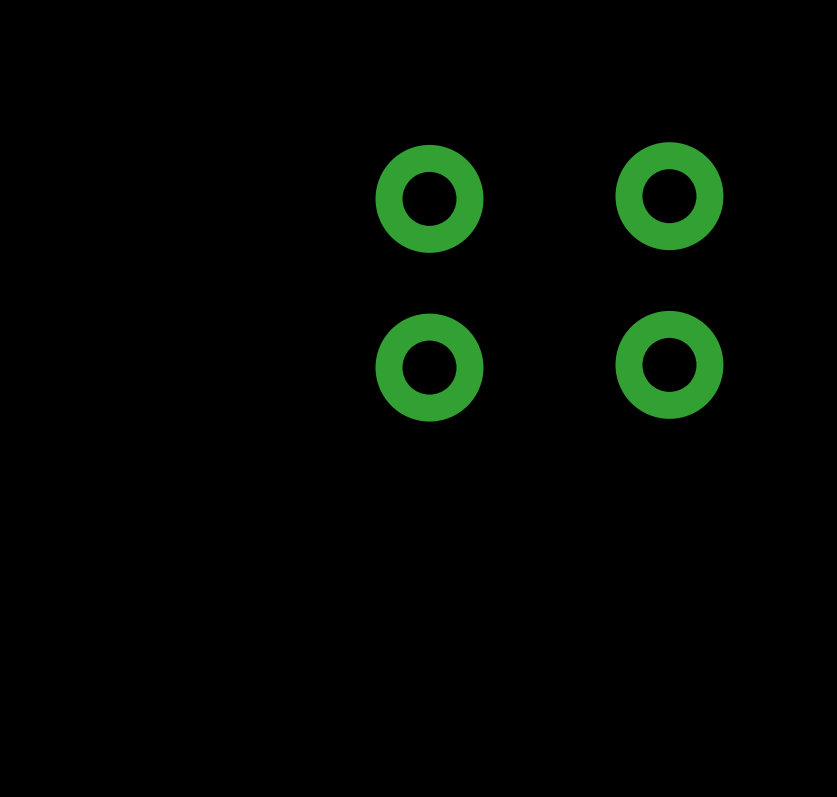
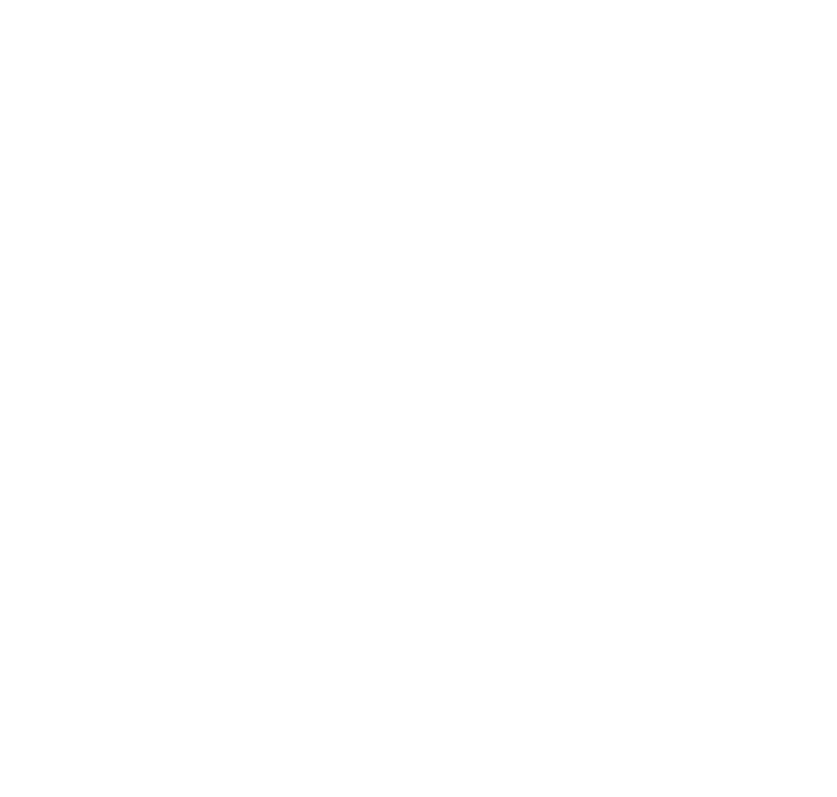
part: (669, 280) -> none
part: (429, 283) -> none

